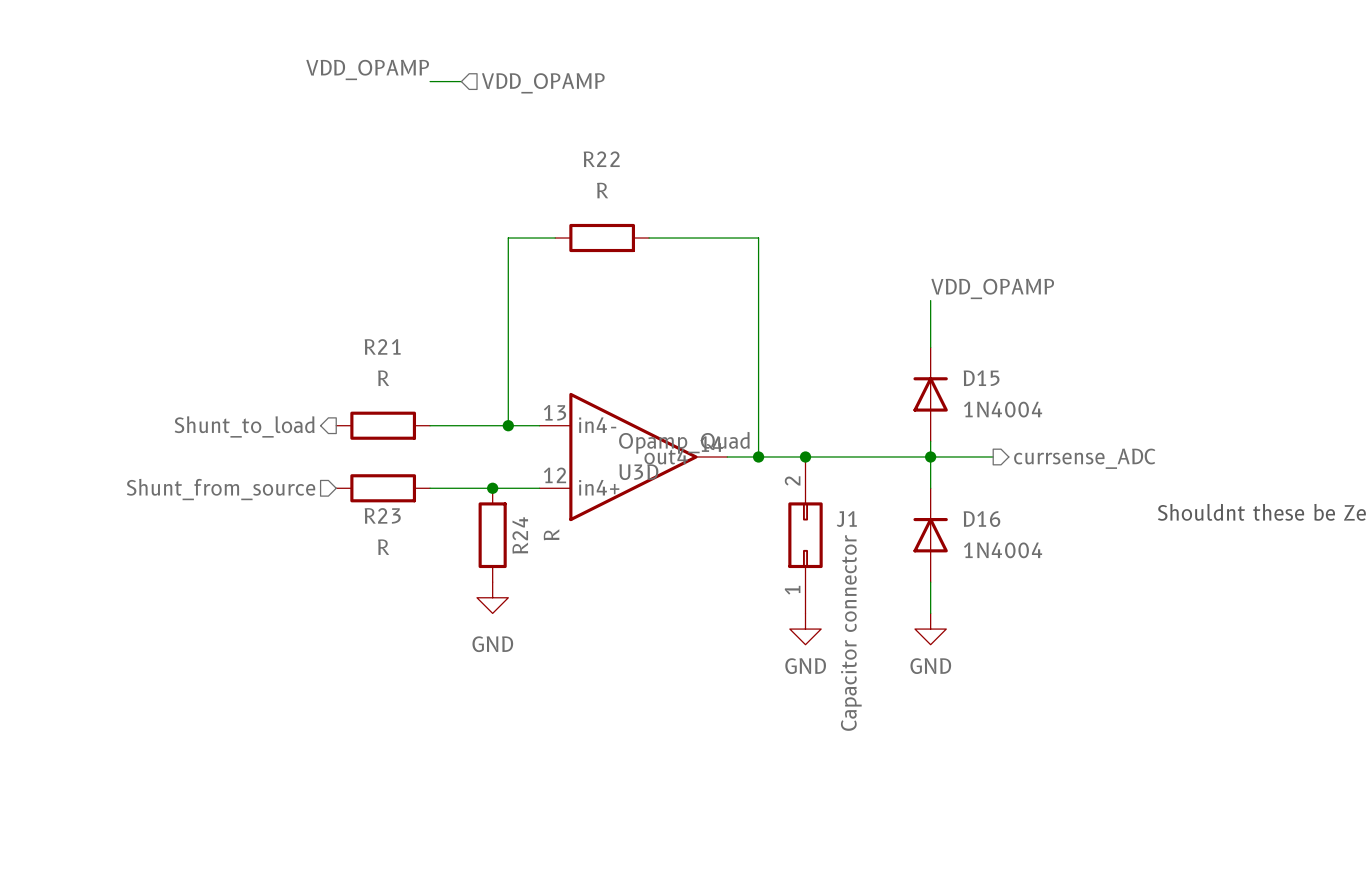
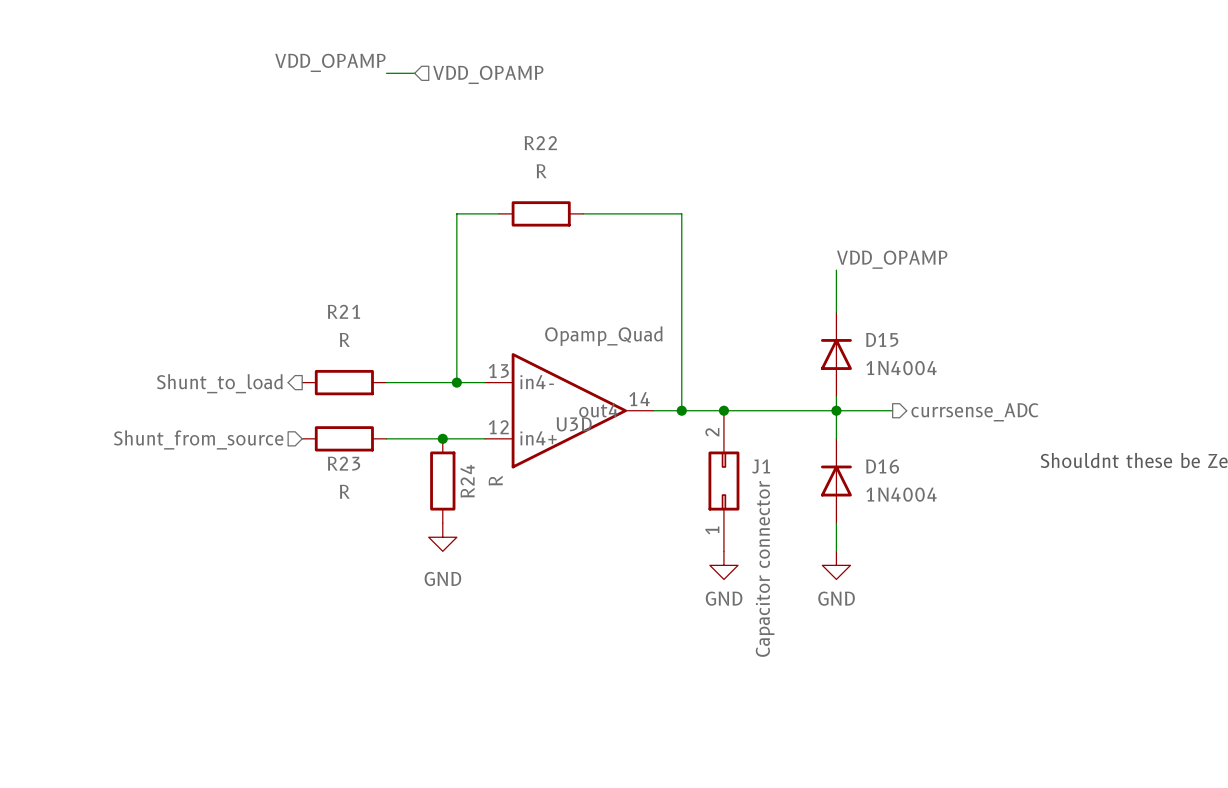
U3D value position: Opamp_Quad (684, 442) -> Opamp_Quad (603, 336)

